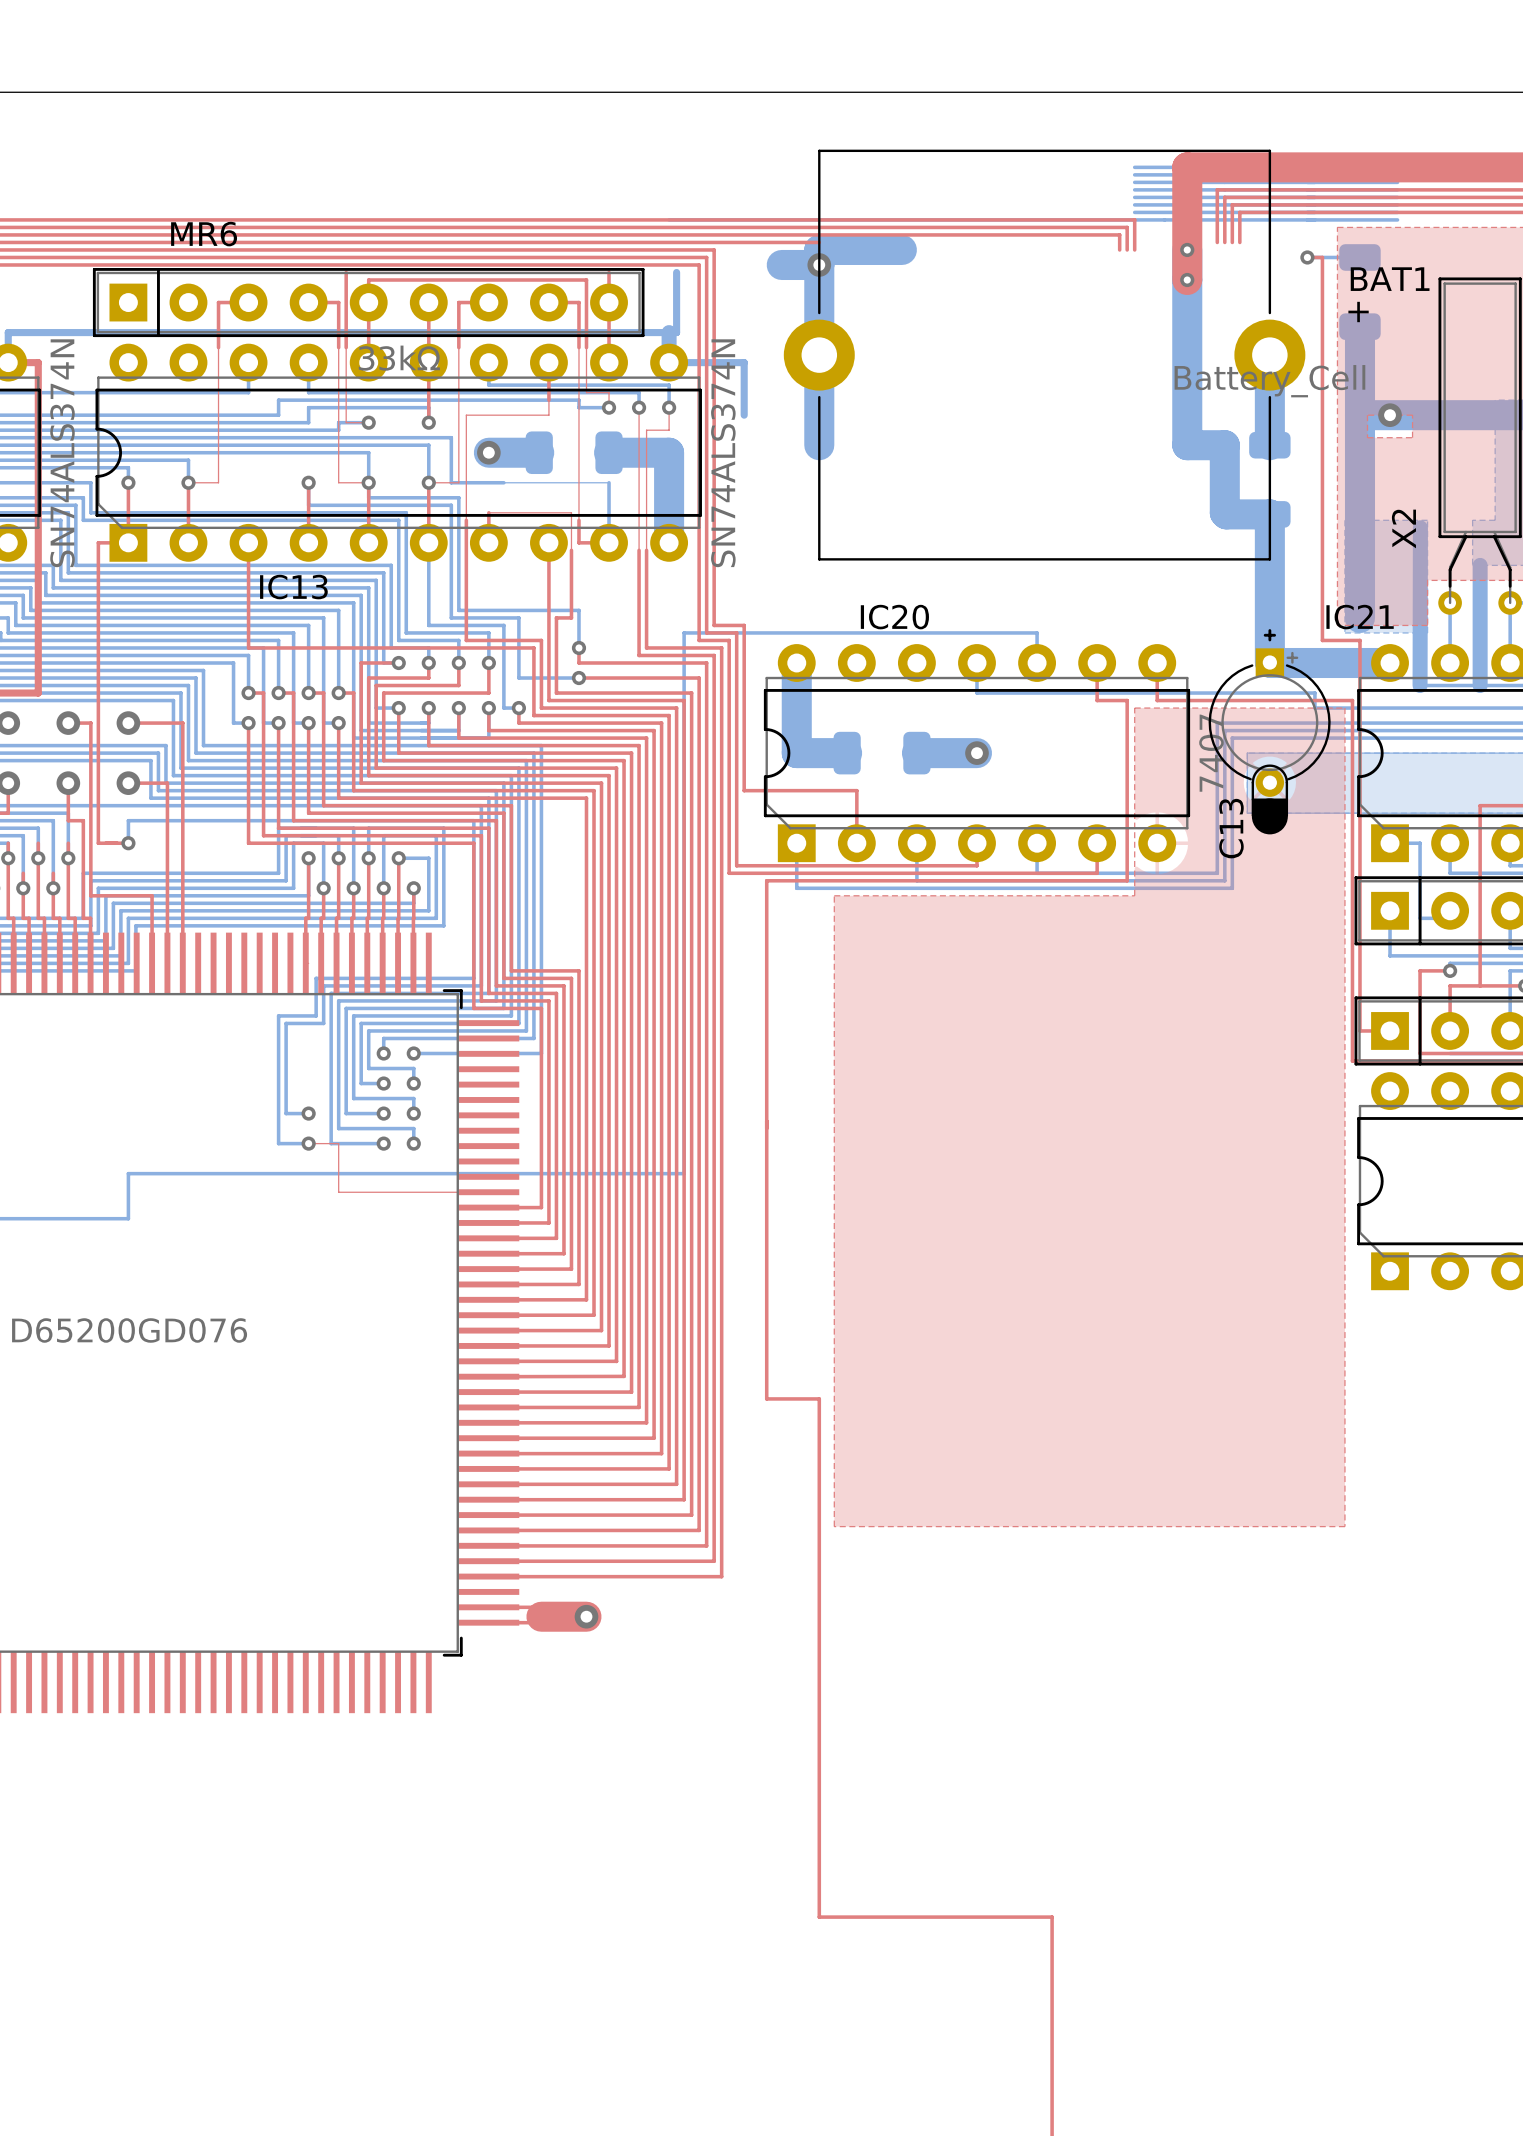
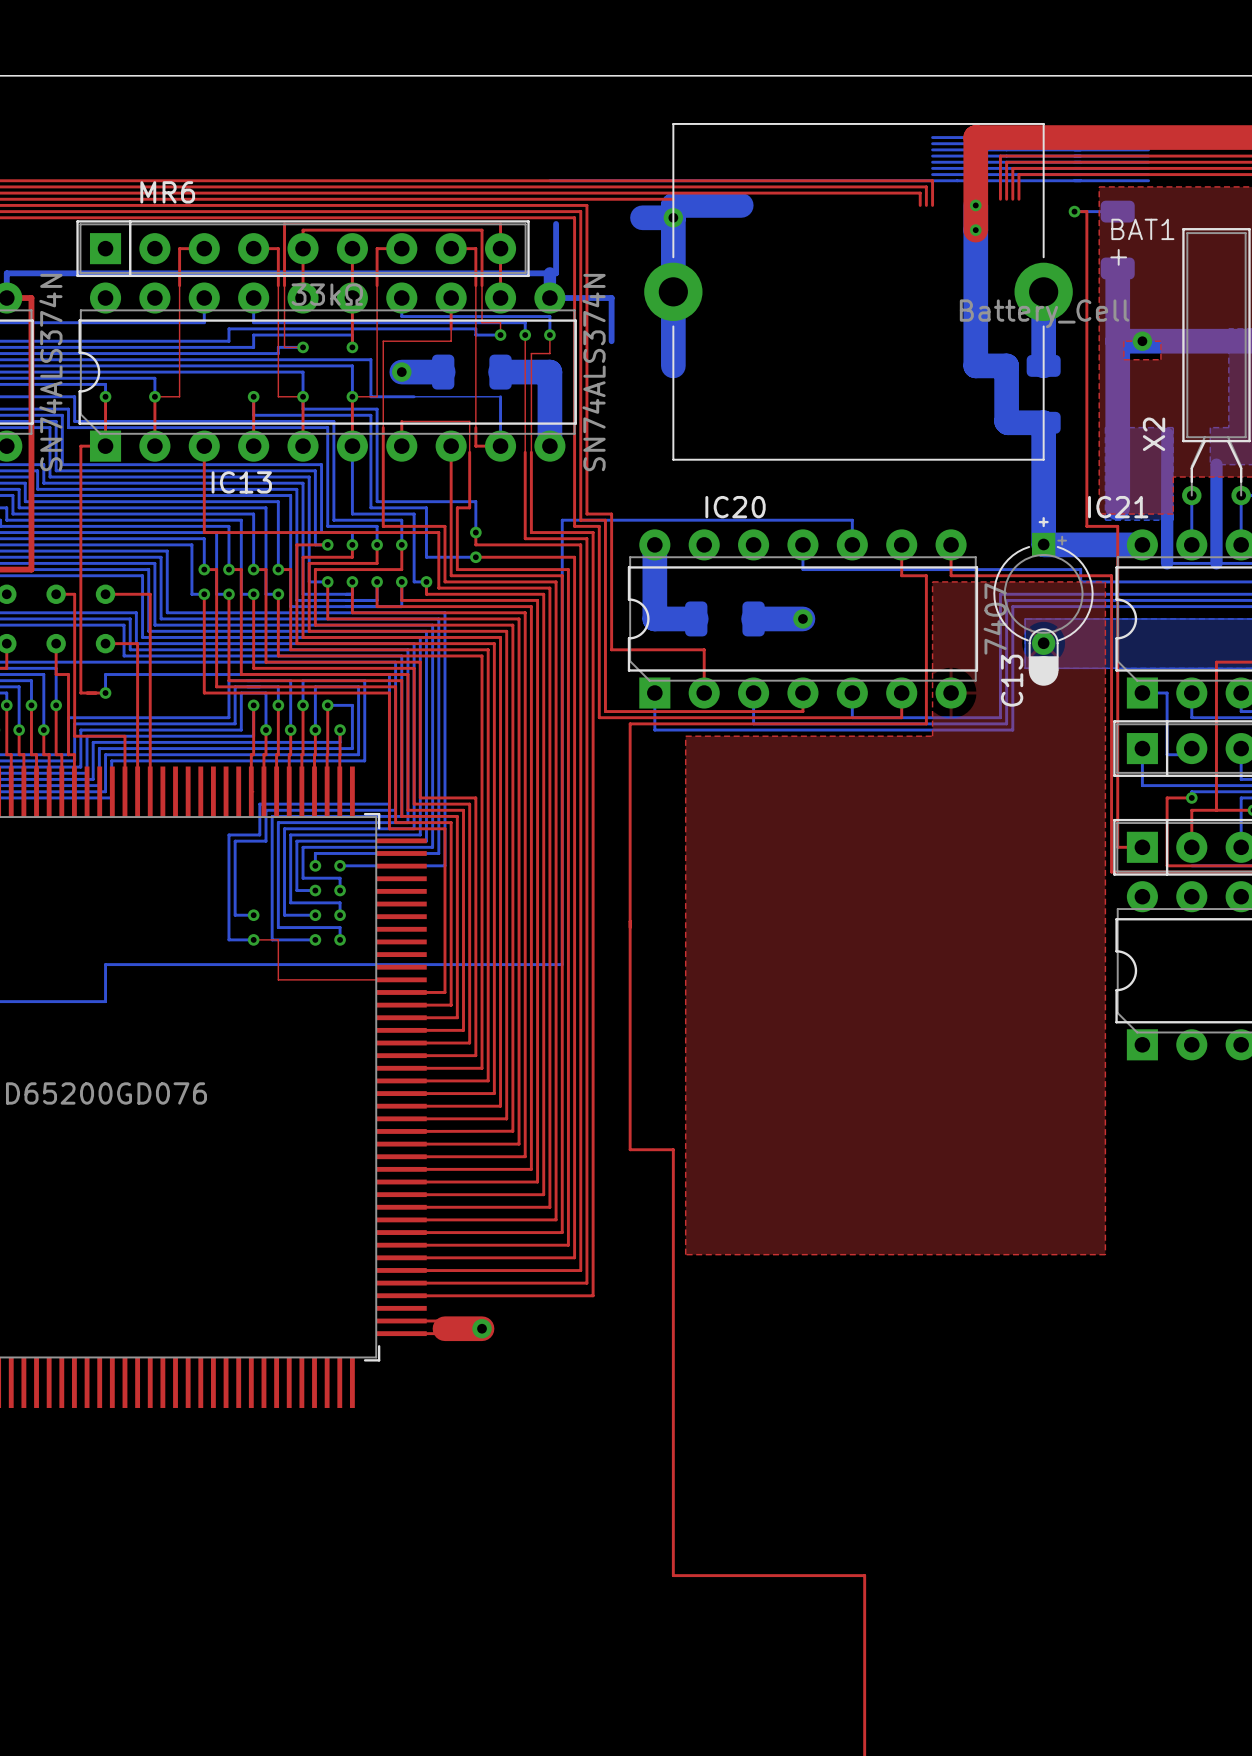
top track: (8, 843) (8, 858) -> none
top track: (38, 843) (38, 858) -> none
top track: (68, 843) (68, 858) -> none
top track: (23, 873) (23, 888) -> none
top track: (53, 873) (53, 888) -> none

